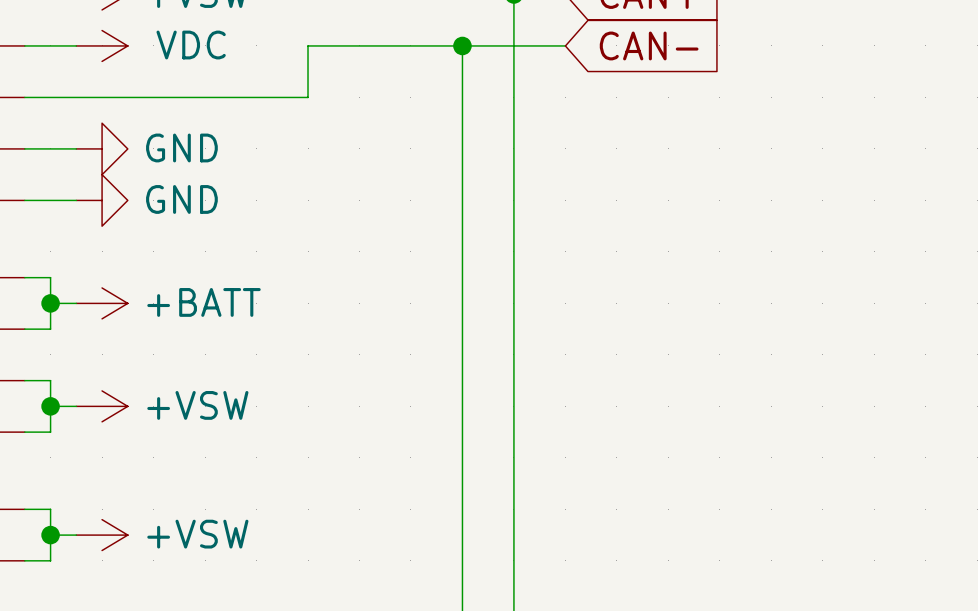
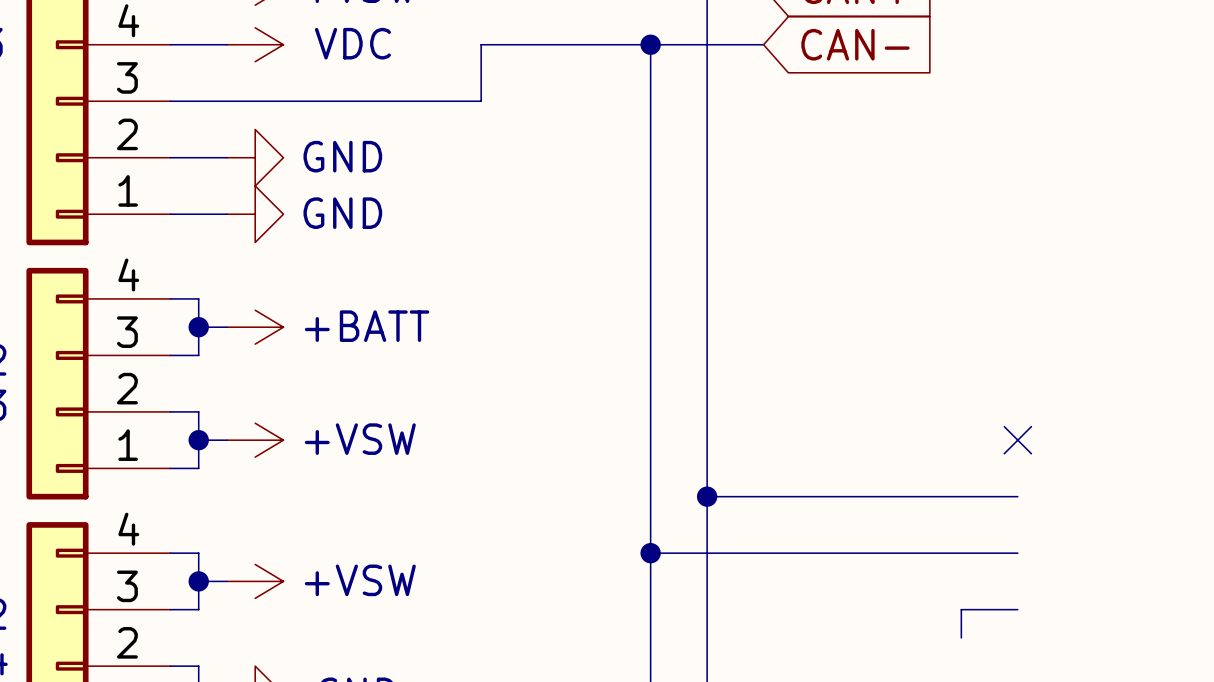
no-connect mark: none -> (1017, 440)
wire: none -> (707, 496) (1017, 496)
junction: none -> (707, 496)
wire: none -> (650, 553) (1017, 553)
junction: none -> (650, 553)
wire: none -> (1017, 609) (961, 609) (961, 637)

